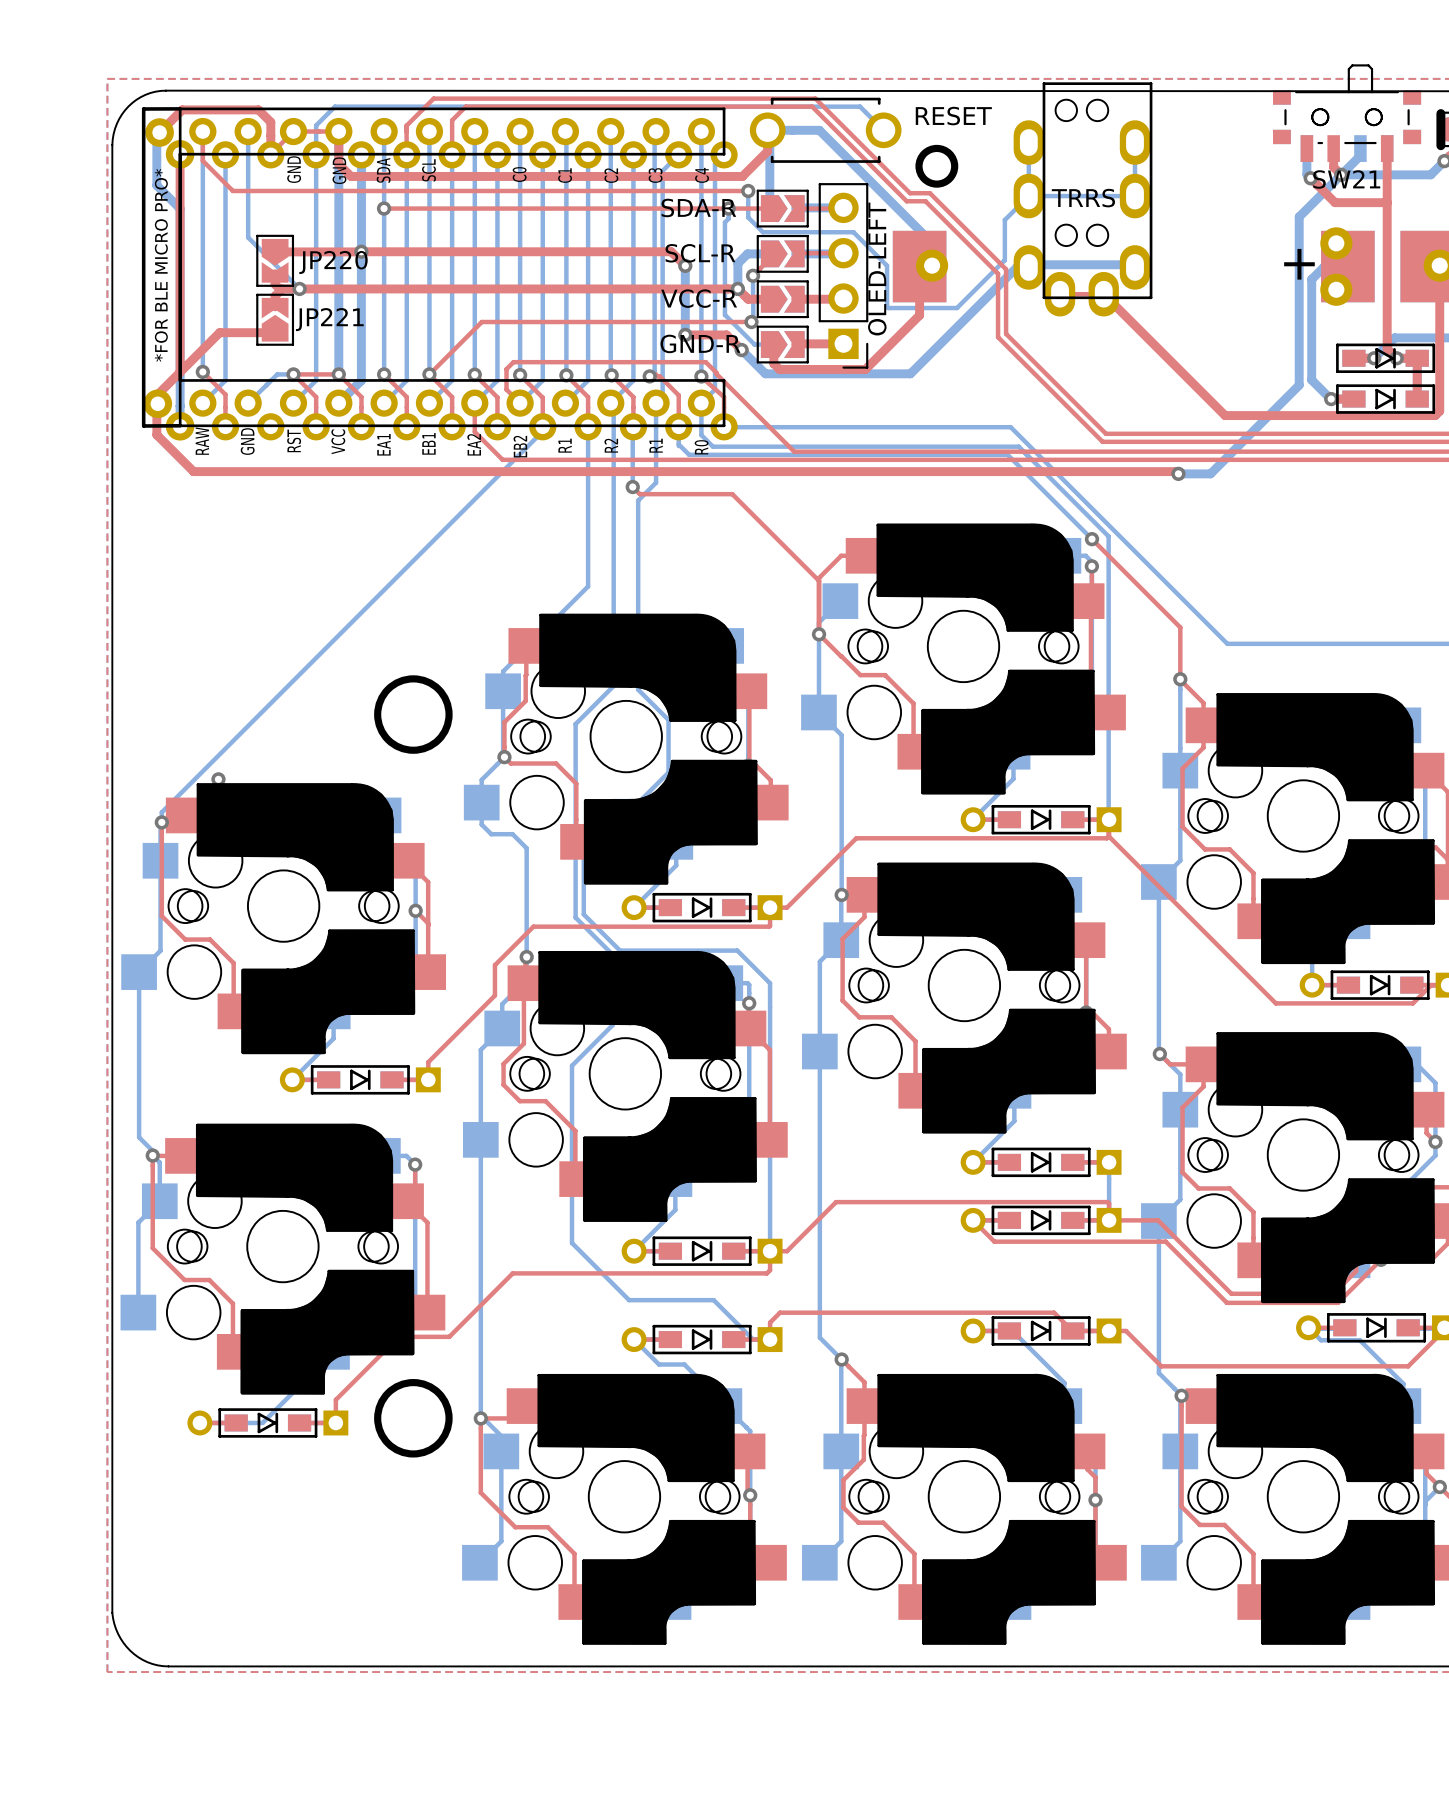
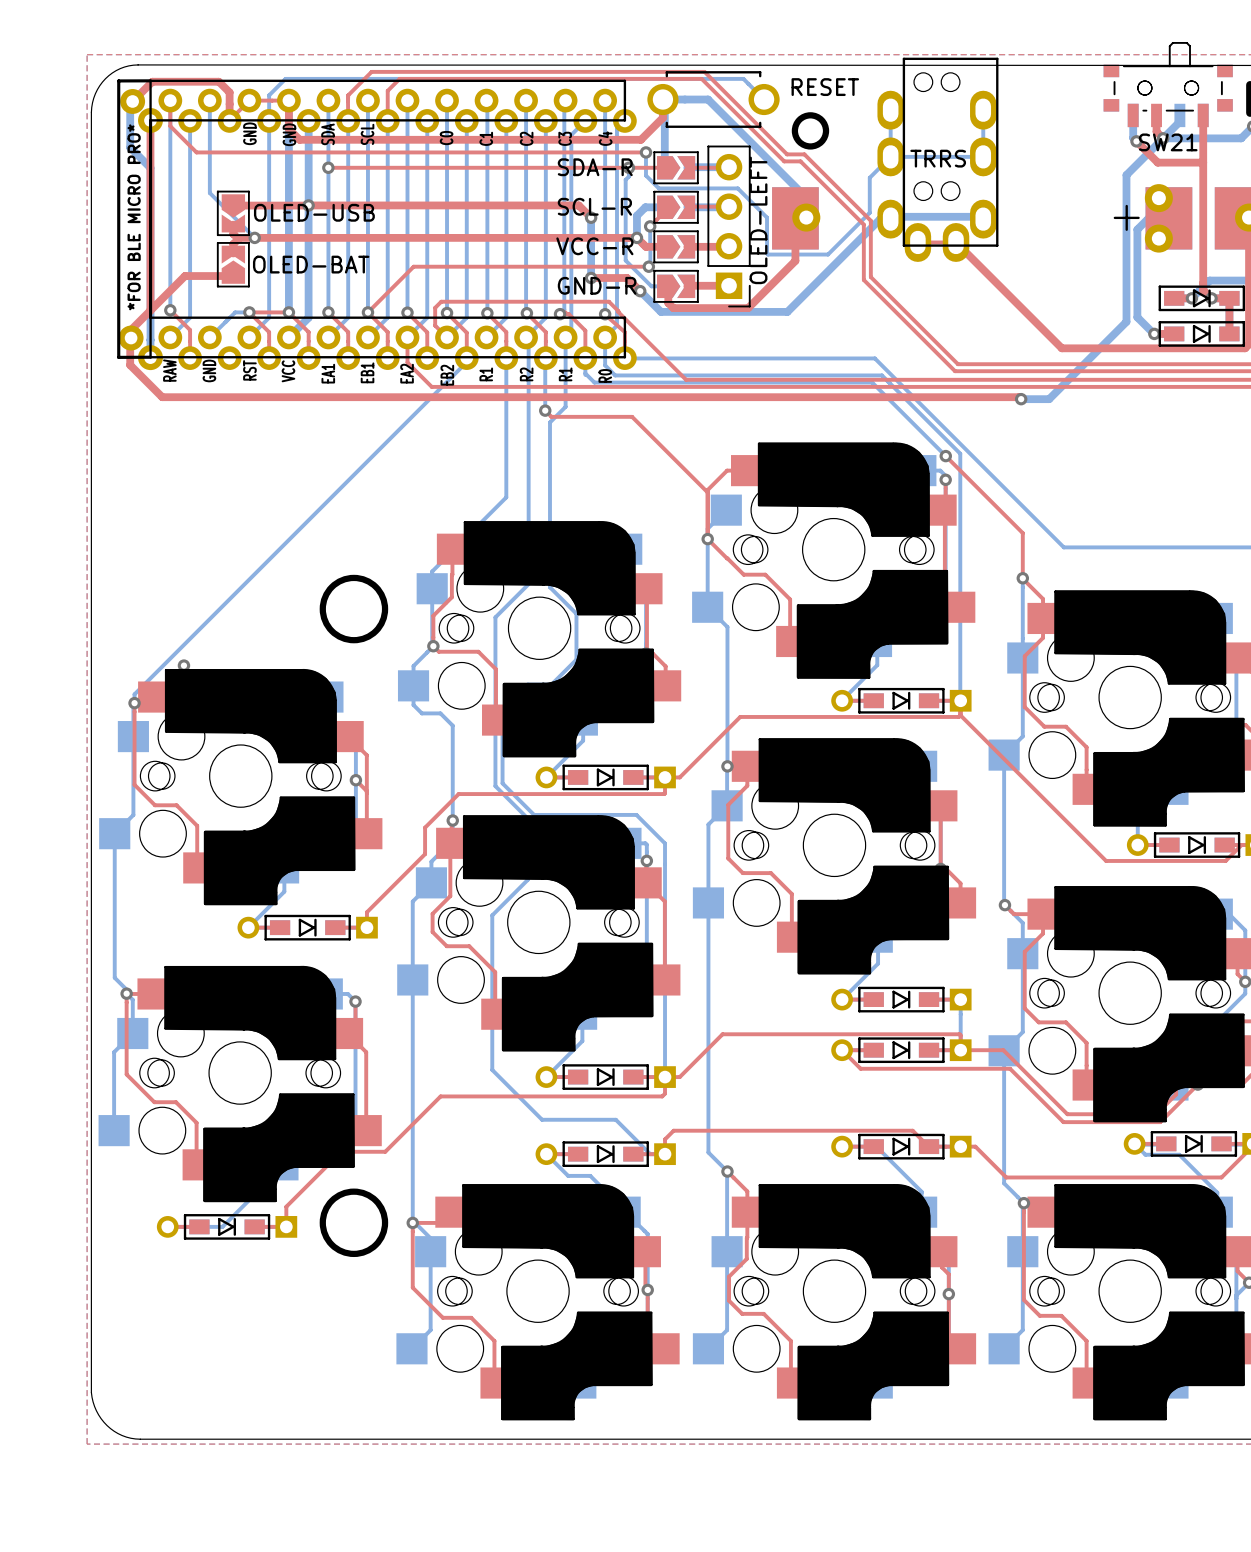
JP220 value: none -> OLED-USB (314, 212)
JP220 name: JP220 (333, 262) -> none
JP221 name: JP221 (329, 319) -> none
JP221 value: none -> OLED-BAT (311, 264)

